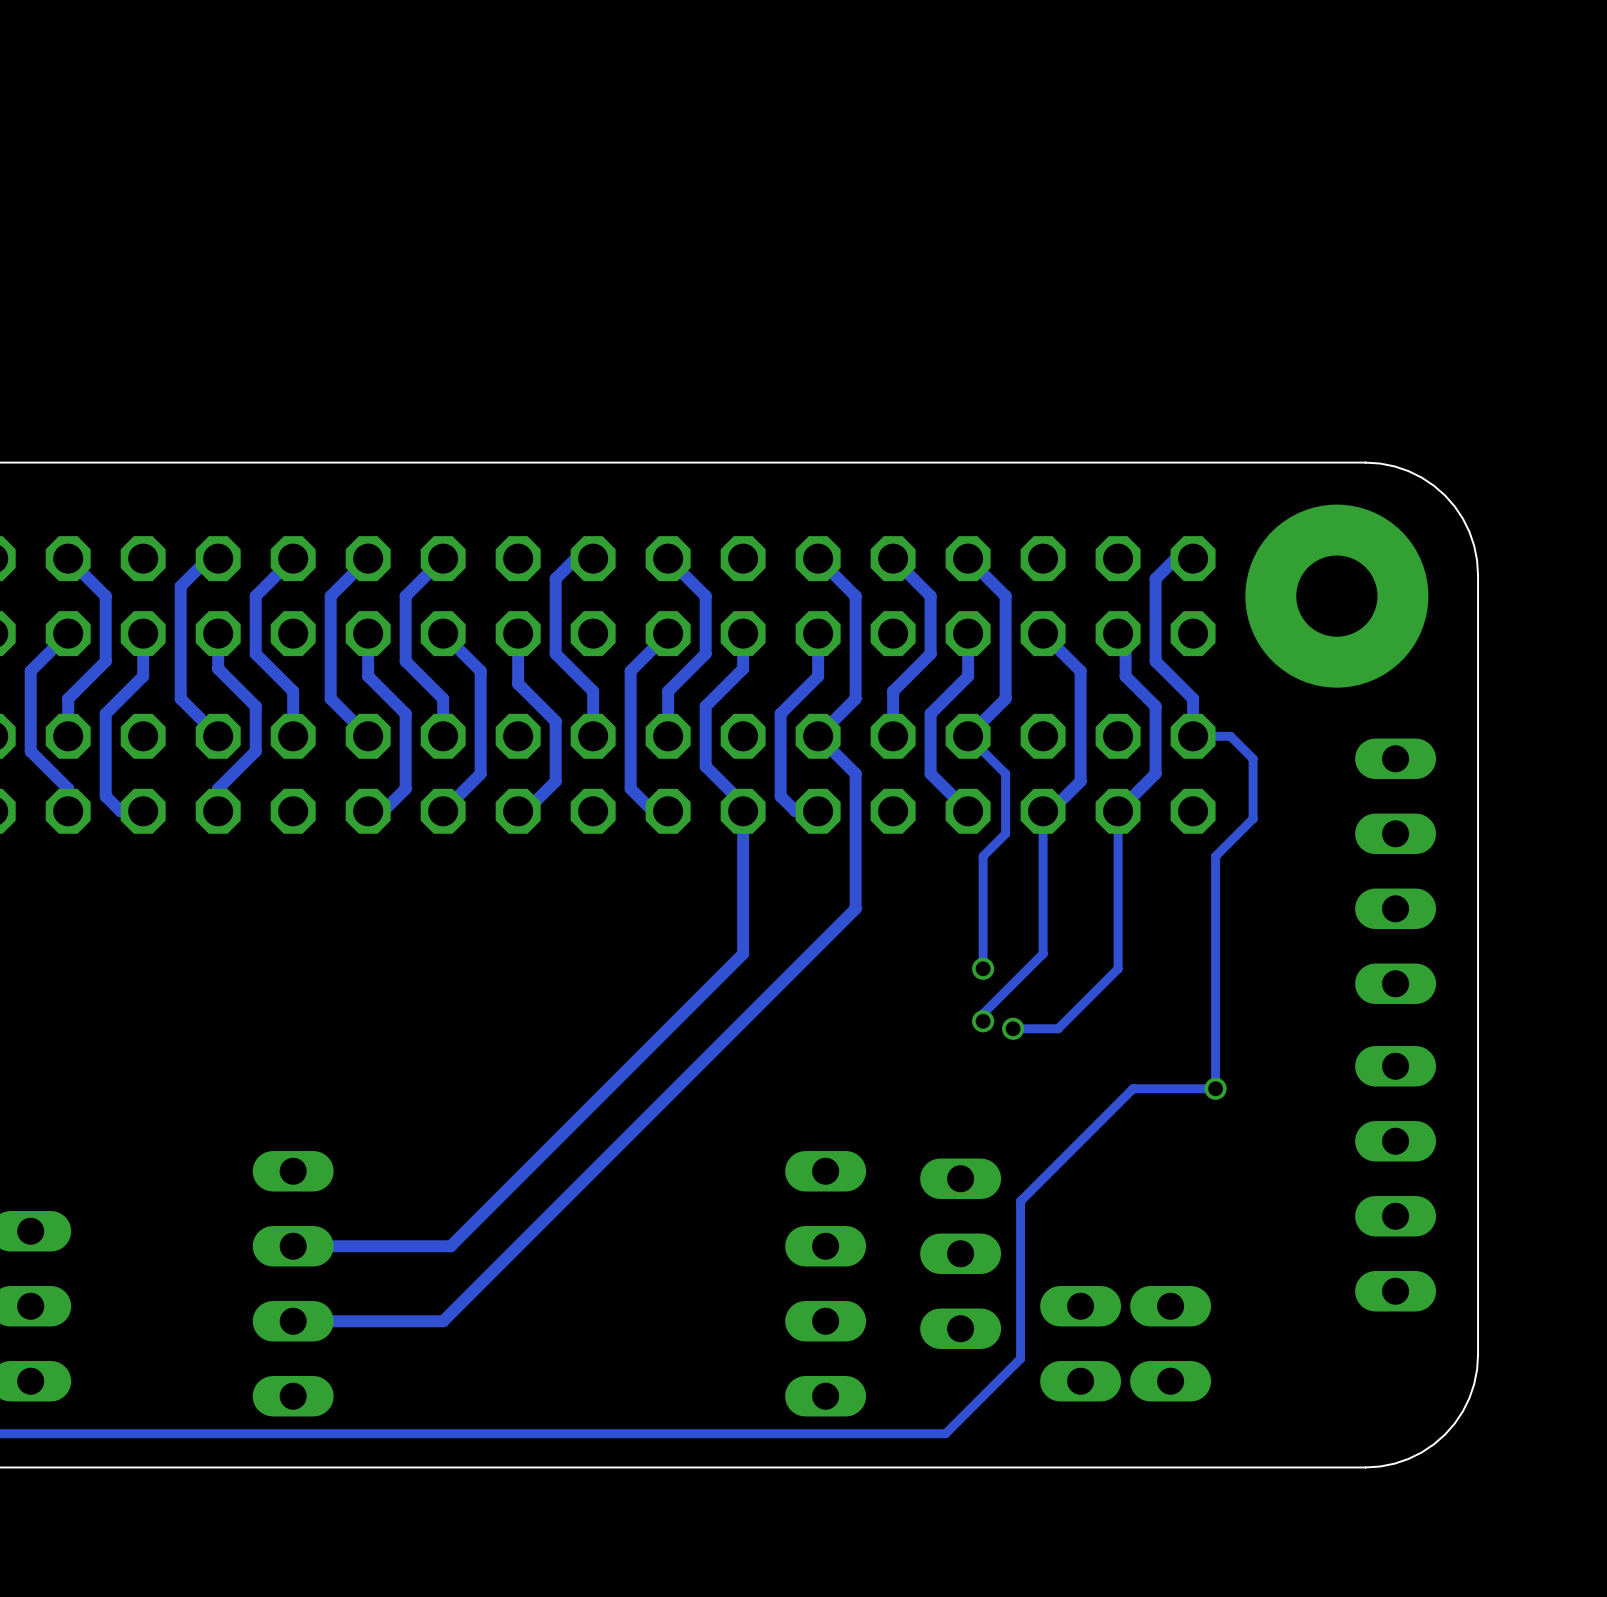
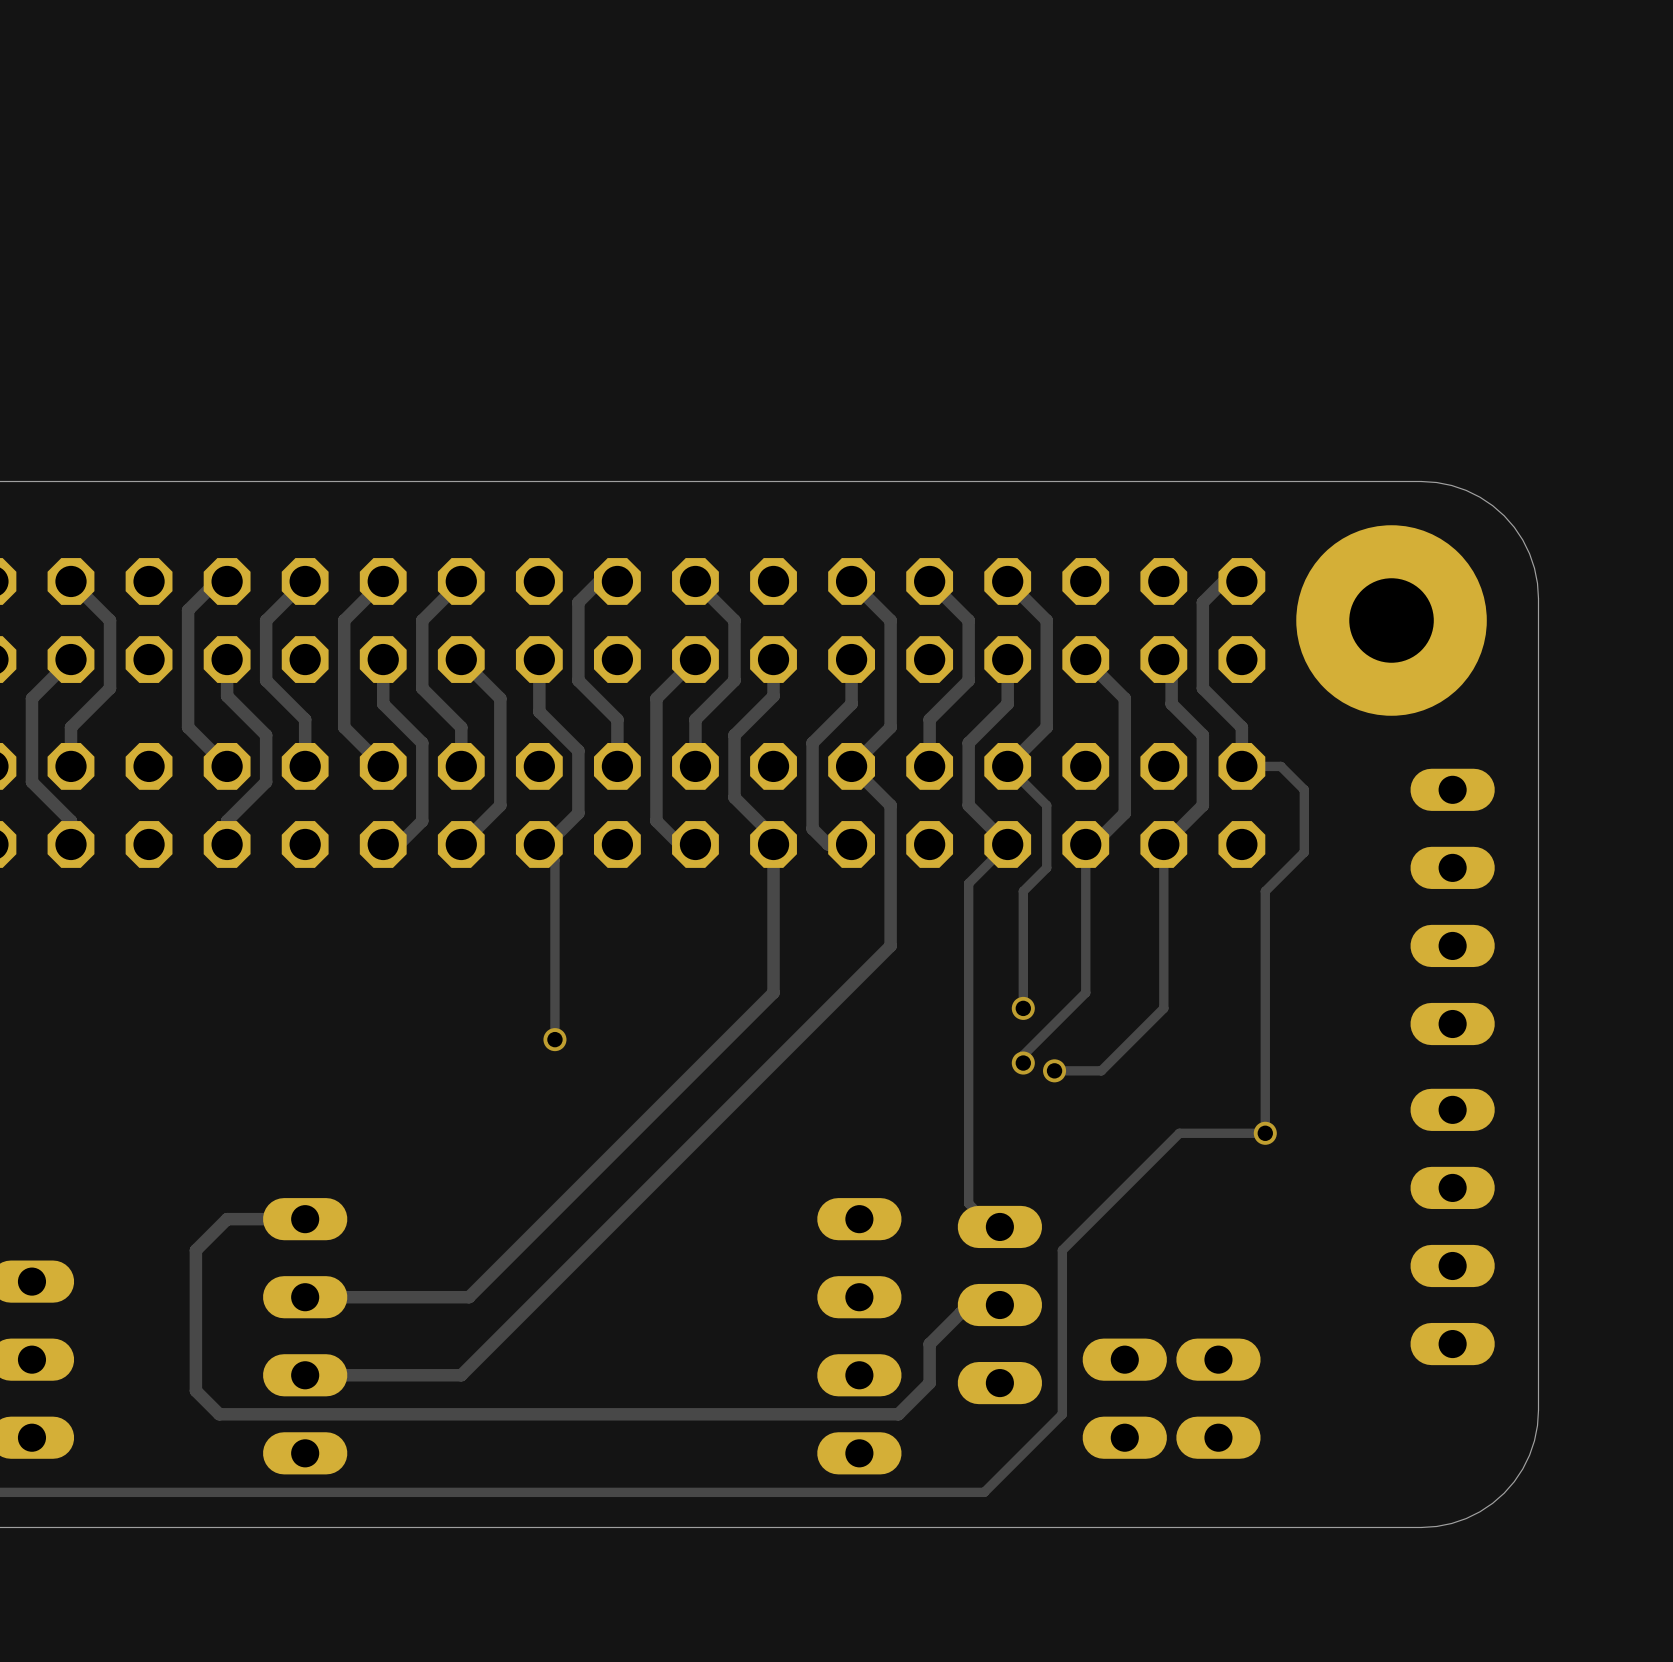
track: (143, 633) (143, 676) (105, 713) (105, 796) (120, 811) (143, 811) -> none
track: none -> (539, 844) (554, 860) (554, 1039)
track: none -> (999, 852) (968, 883) (968, 1203) (992, 1226) (999, 1226)
via: none -> (554, 1039)
track: none -> (305, 1219) (227, 1219) (195, 1250) (195, 1390) (219, 1414) (898, 1414) (929, 1383) (929, 1344) (960, 1312) (1007, 1312)

